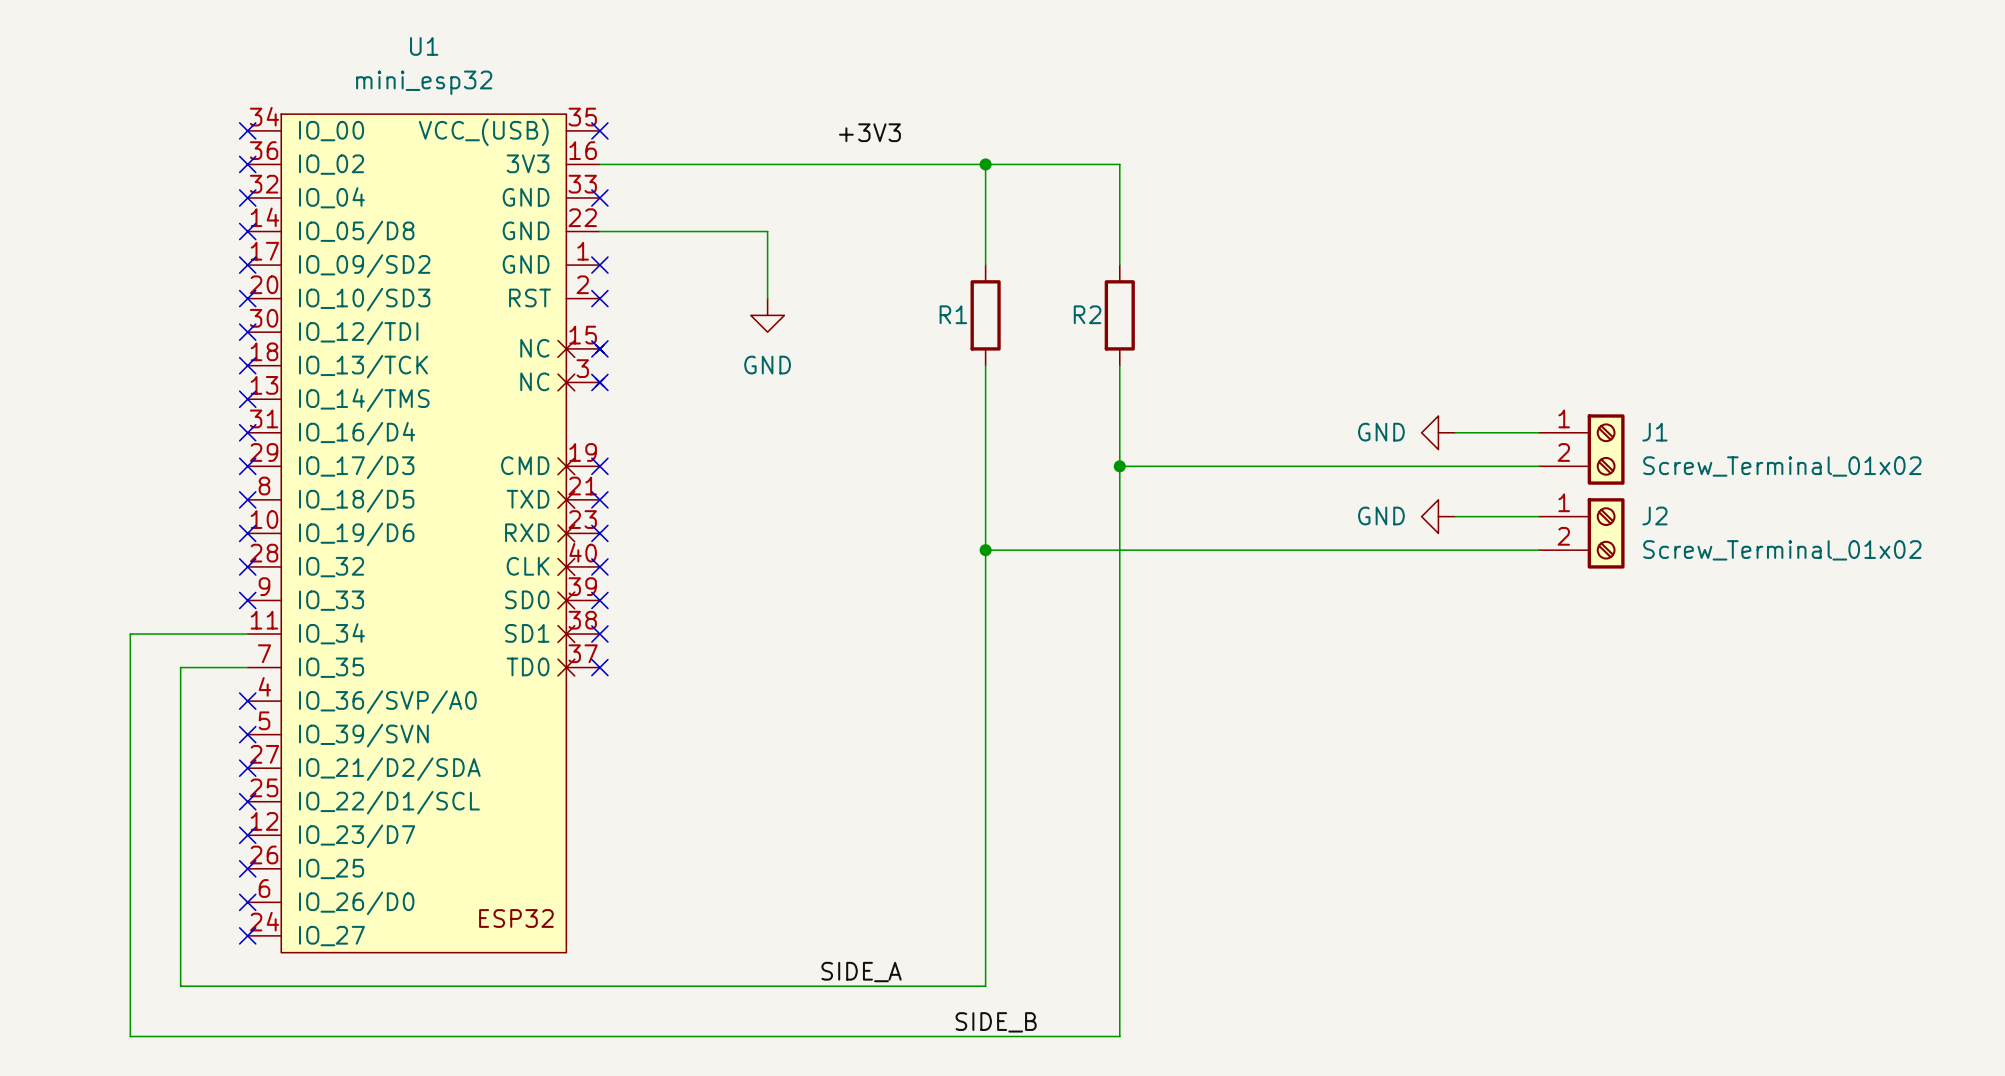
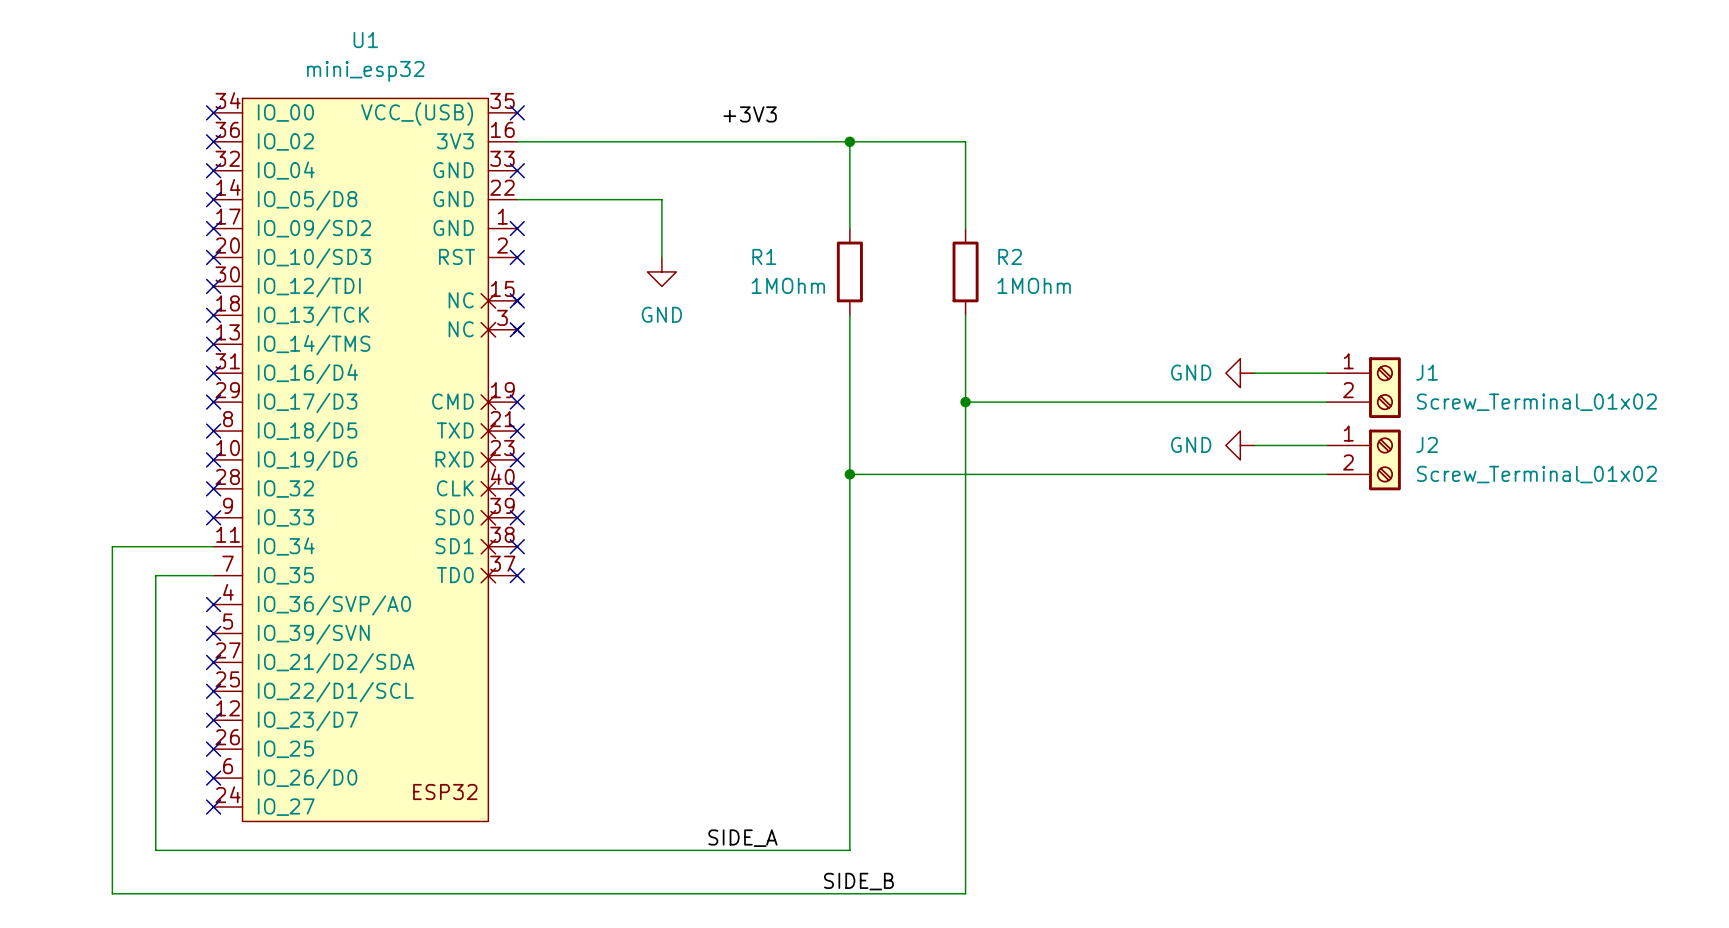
R1 name position: R1 (953, 314) -> R1 (764, 256)
R2 name position: R2 (1087, 314) -> R2 (1010, 256)
R1 value: none -> 1MOhm (788, 285)
R2 value: none -> 1MOhm (1034, 285)

